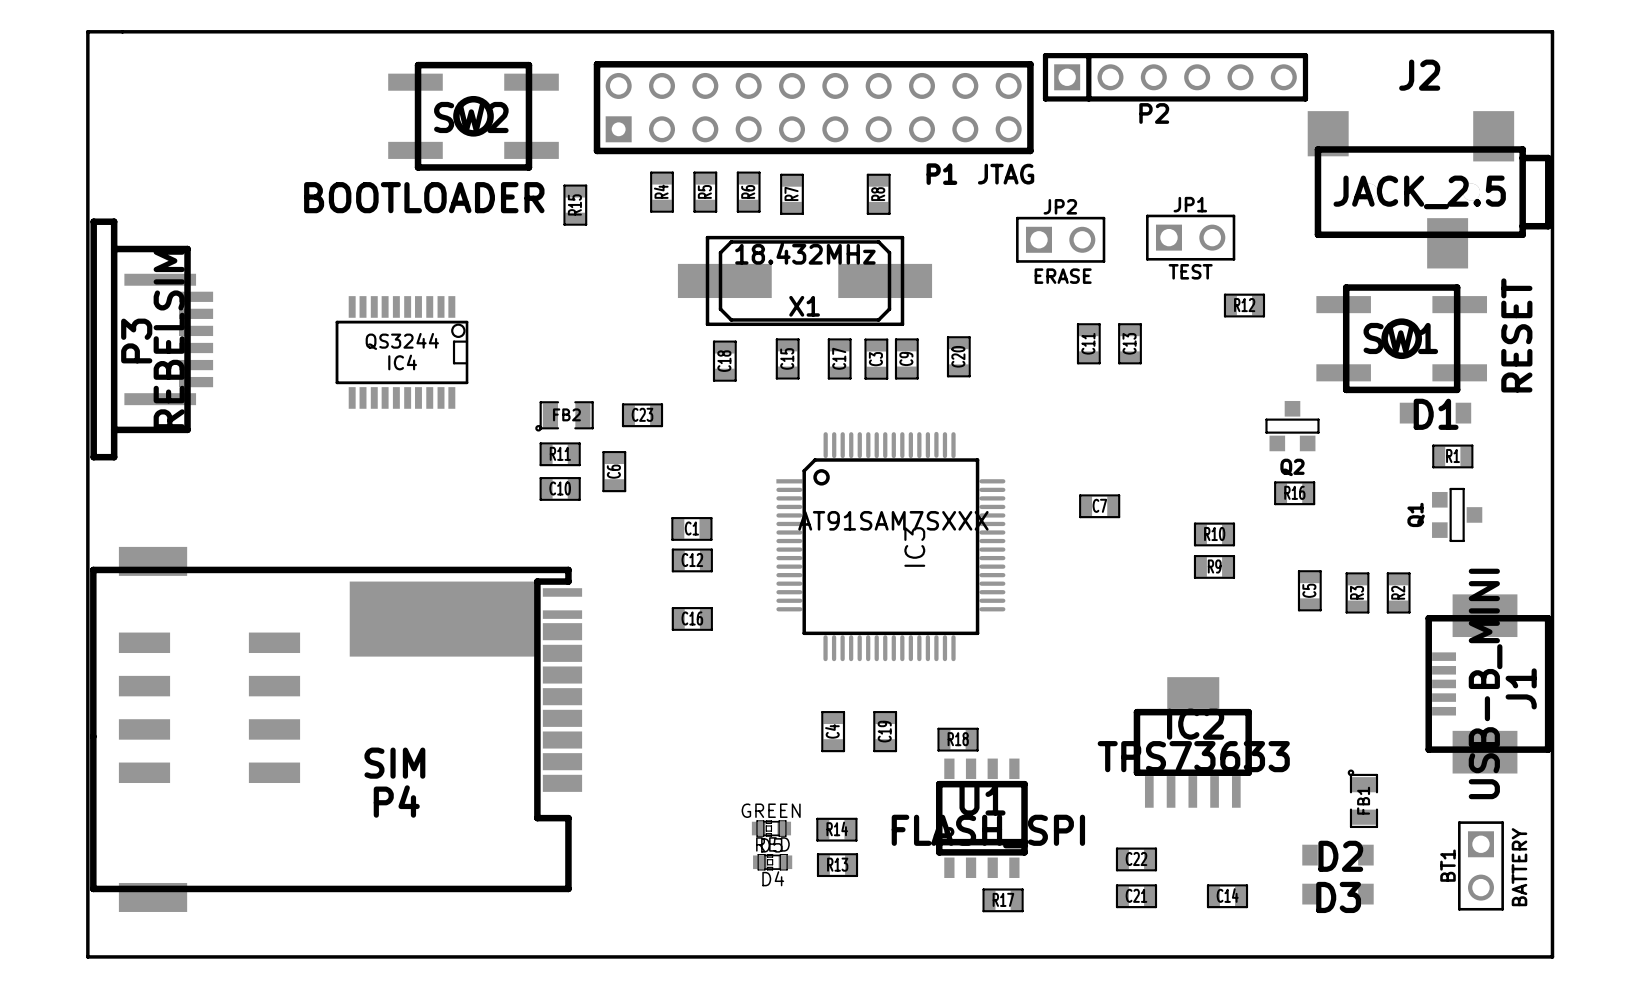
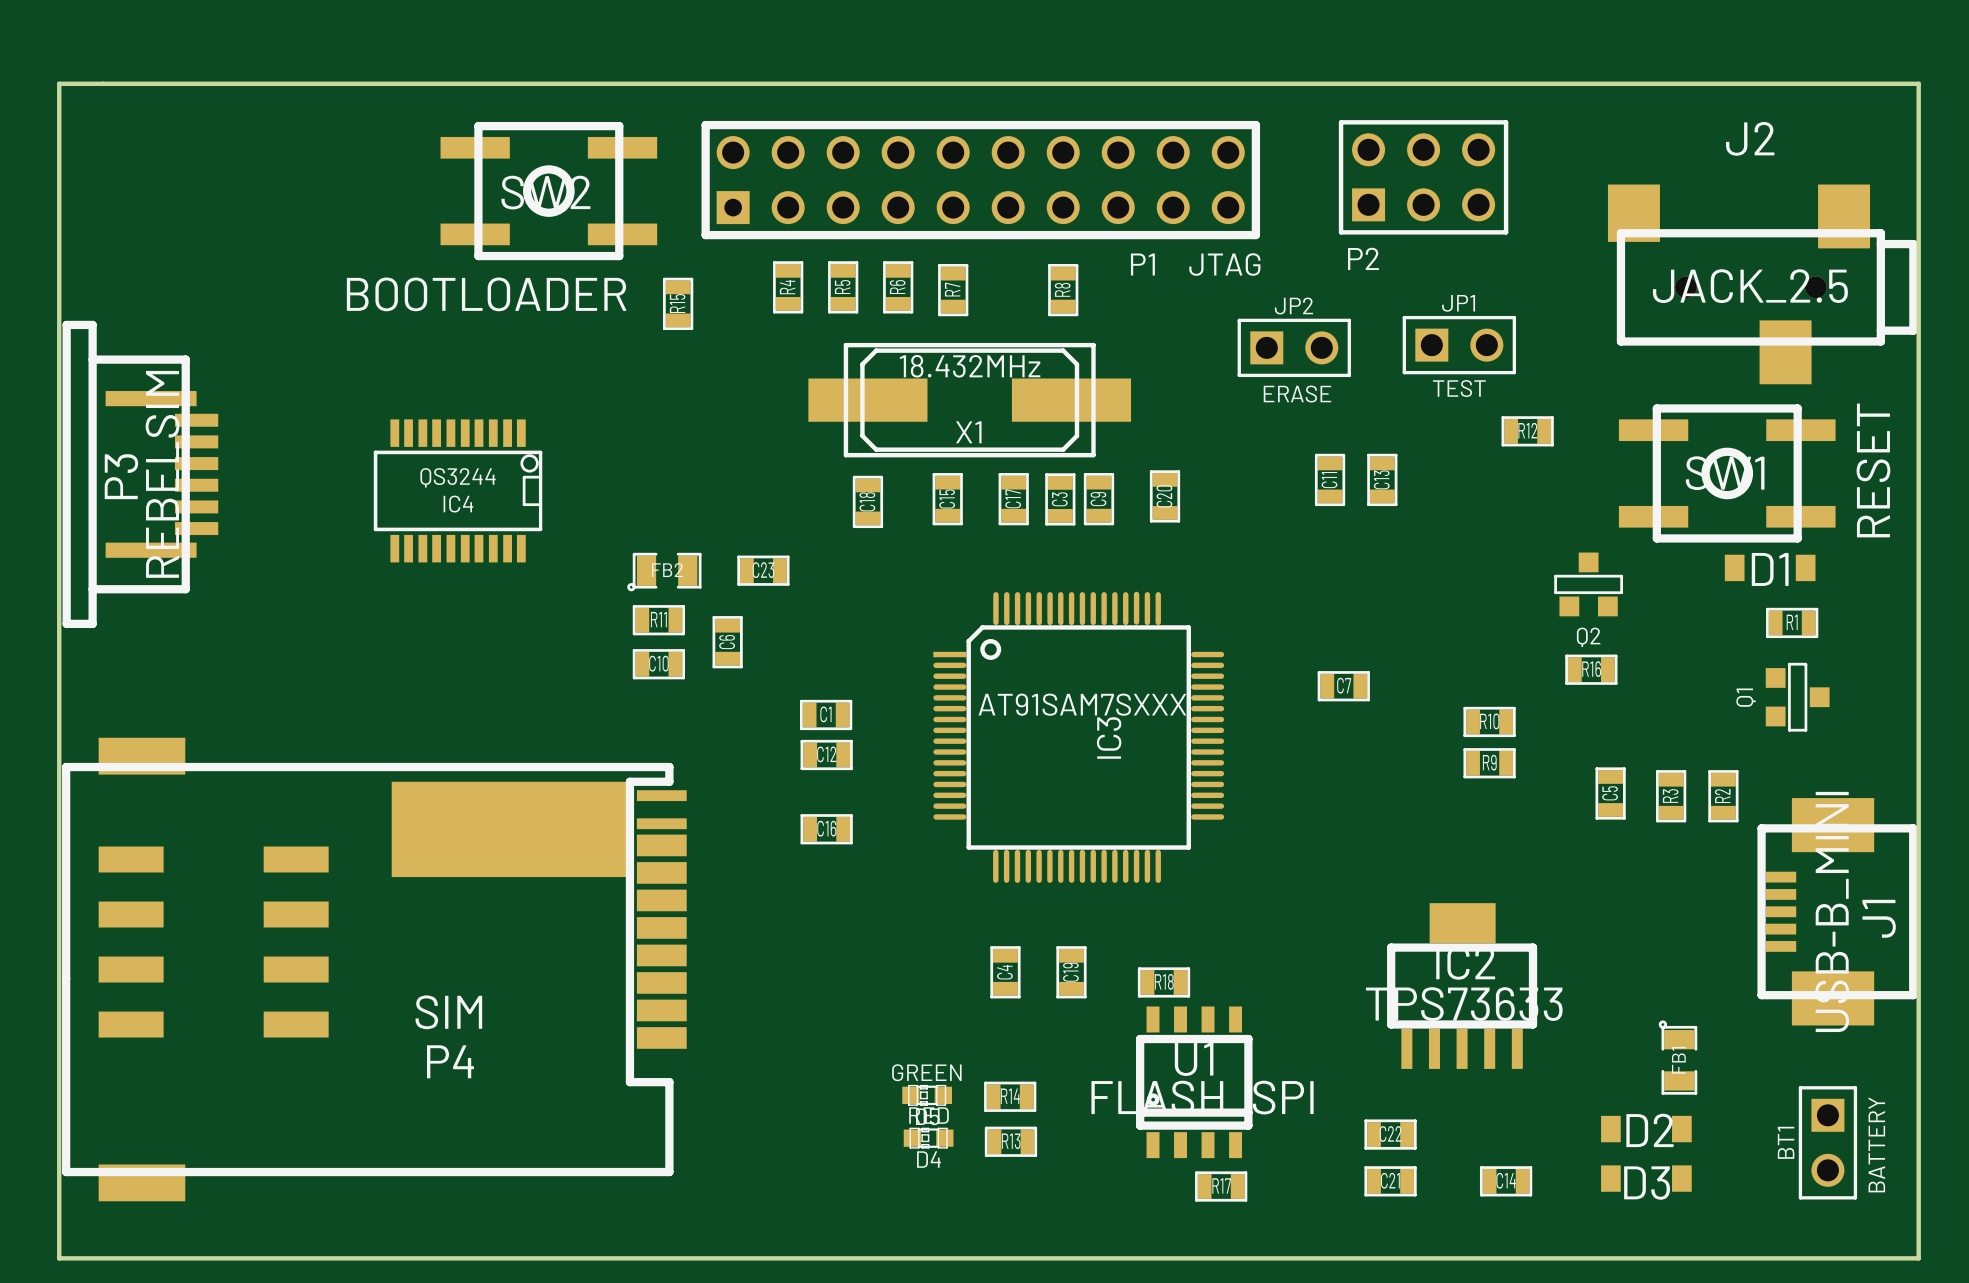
P2 footprint: [1042, 53, 1309, 102] -> [1338, 120, 1509, 235]
P2 name position: P2 (1154, 113) -> P2 (1363, 258)

